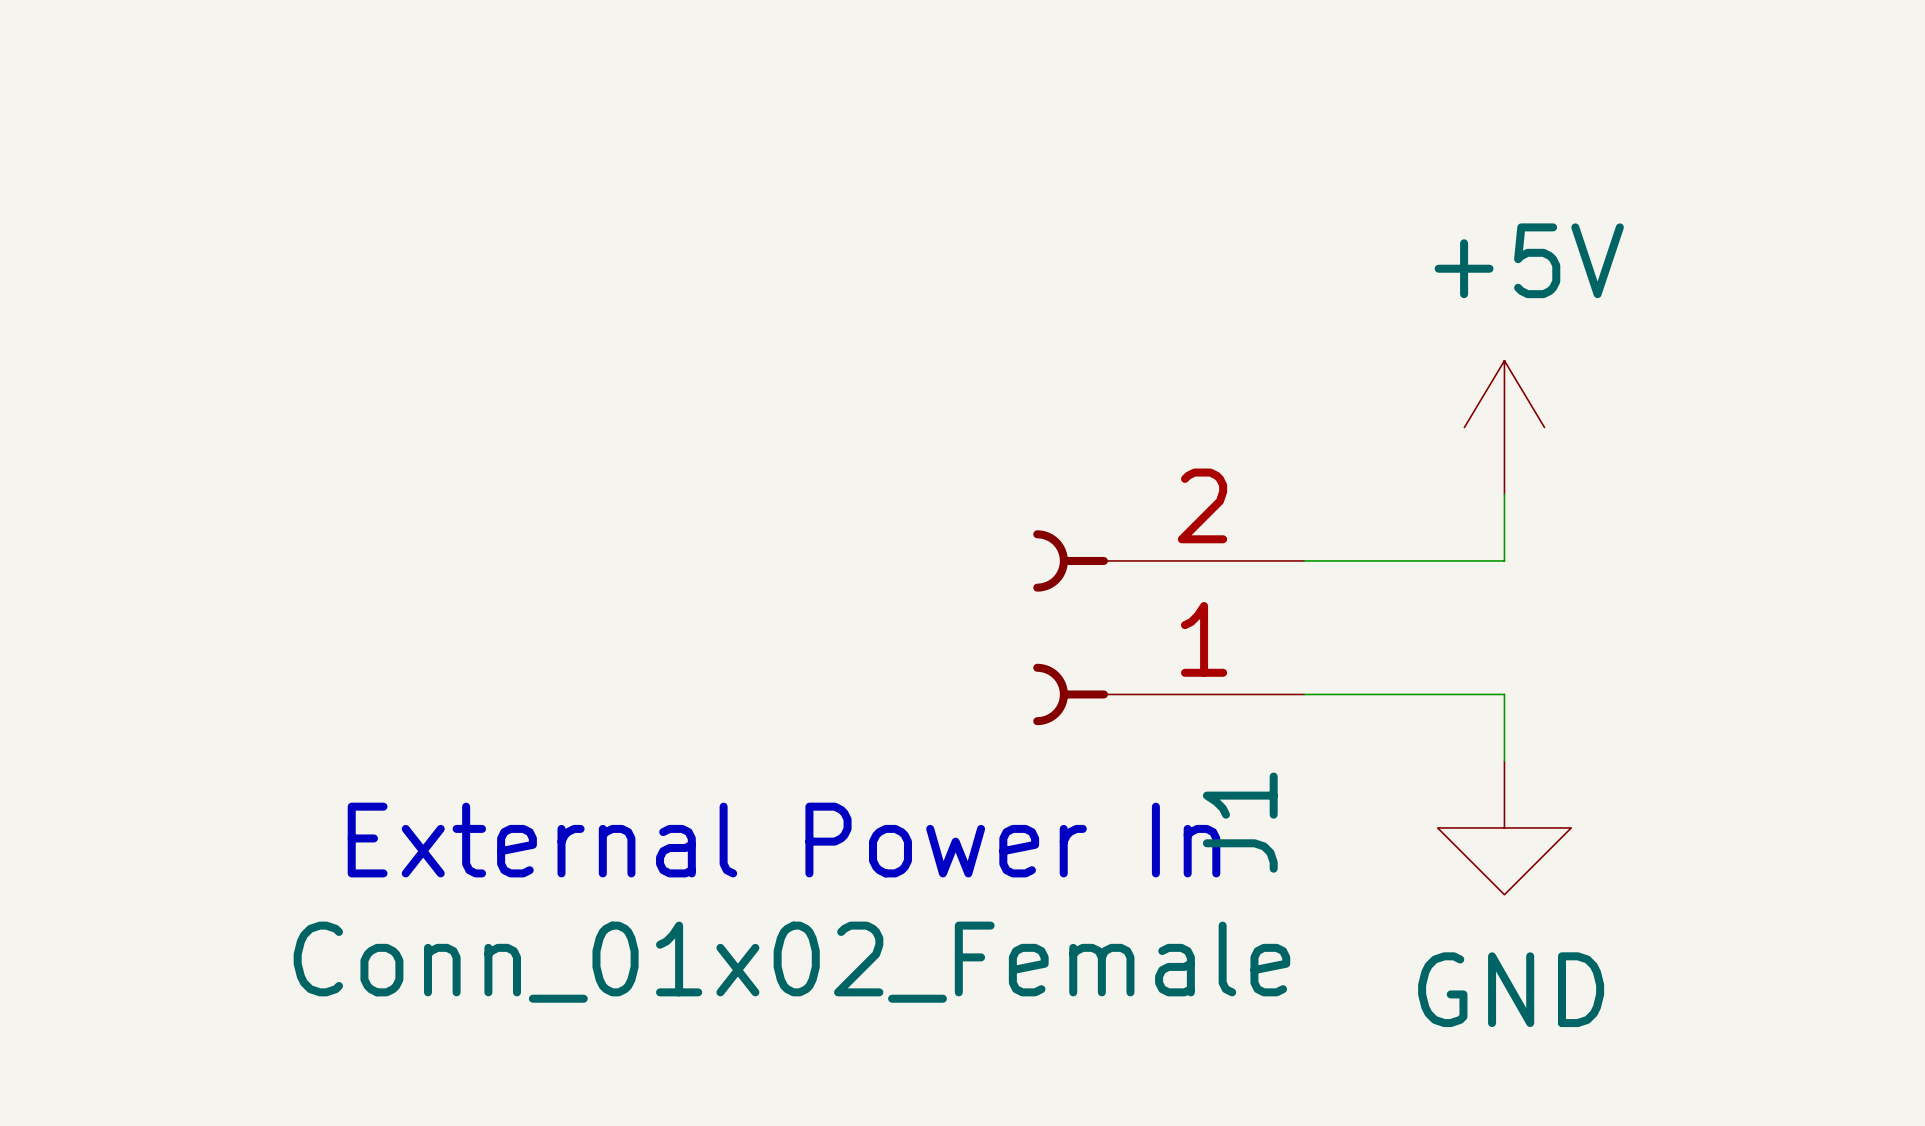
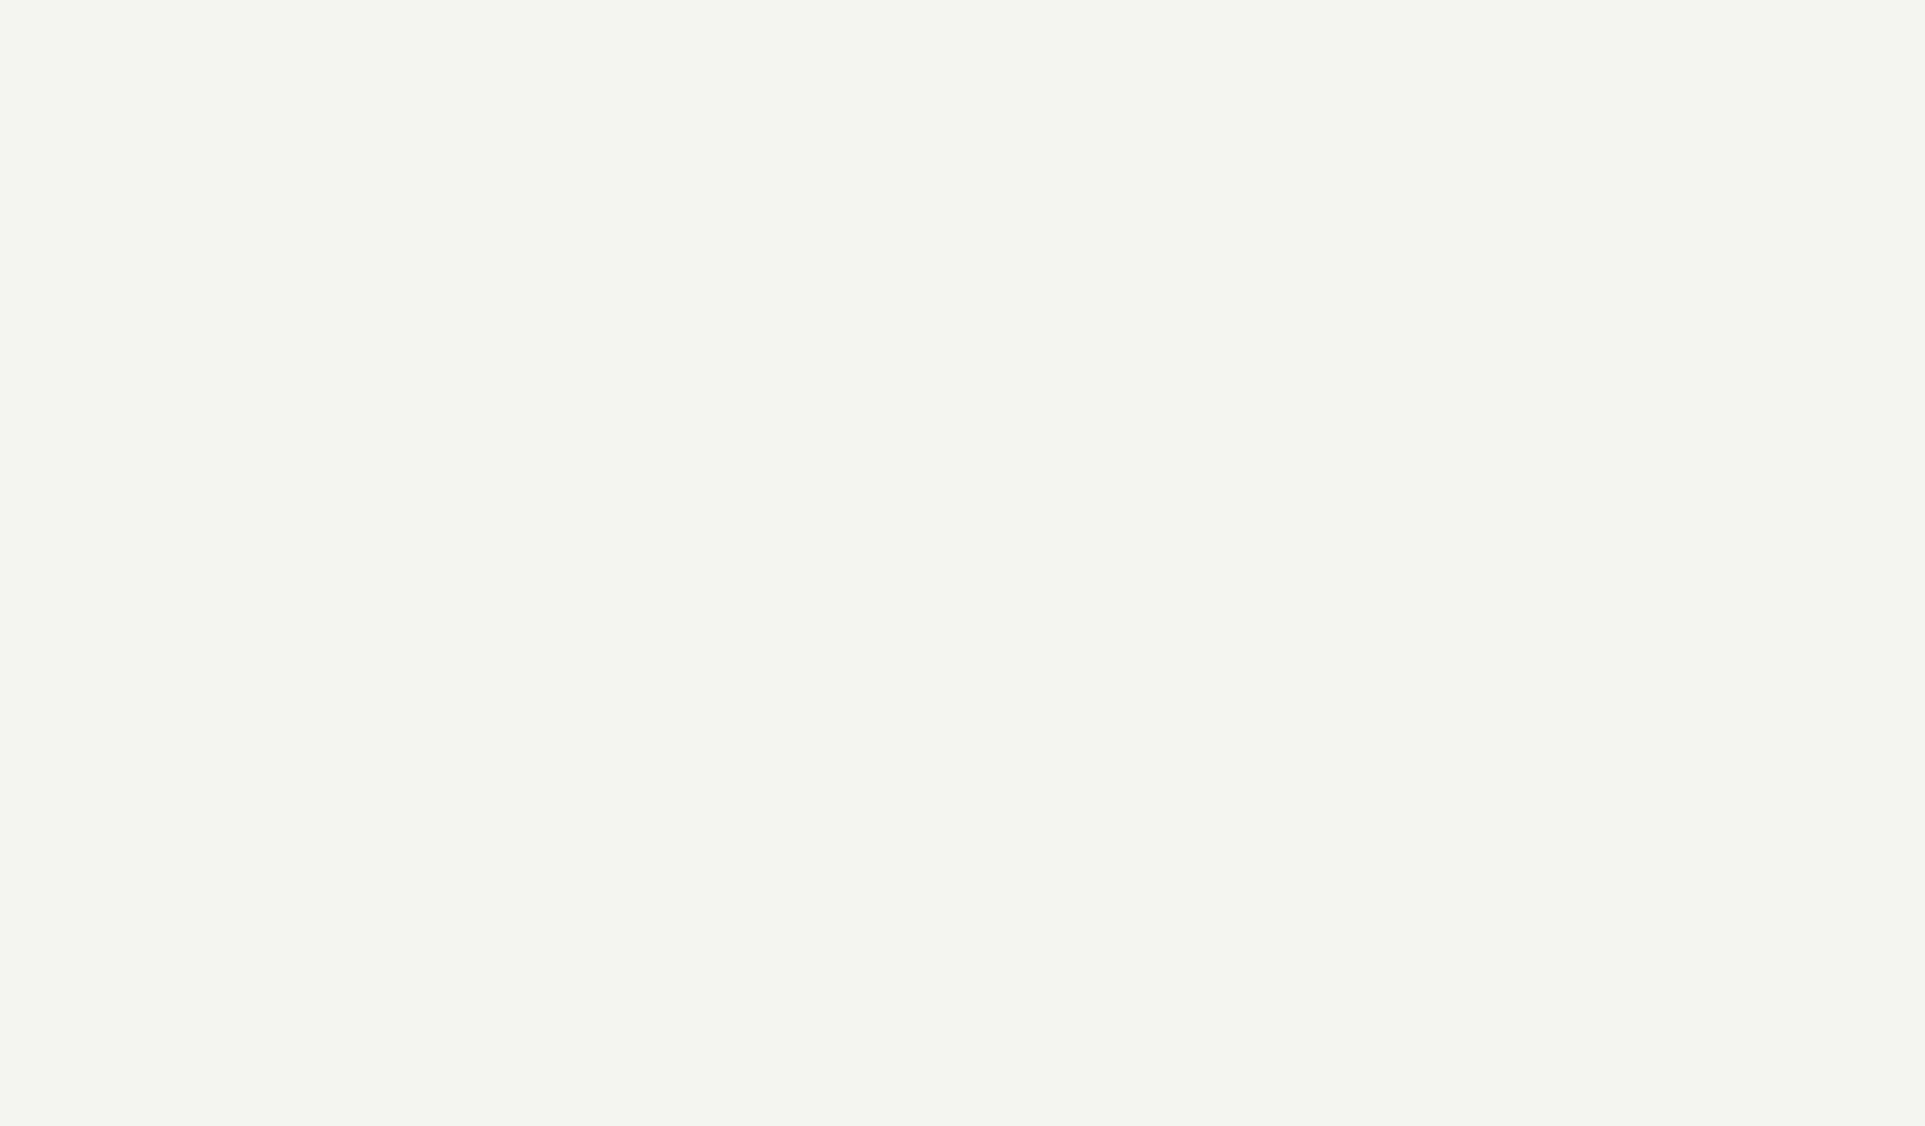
power symbol: +5V (1504, 427) -> none
wire: (1504, 494) (1504, 560) (1304, 560) -> none
J1: Conn_01x02_Female (1168, 627) -> none
wire: (1304, 694) (1504, 694) (1504, 761) -> none
power symbol: GND (1504, 827) -> none
text: External Power In (784, 840) -> none

